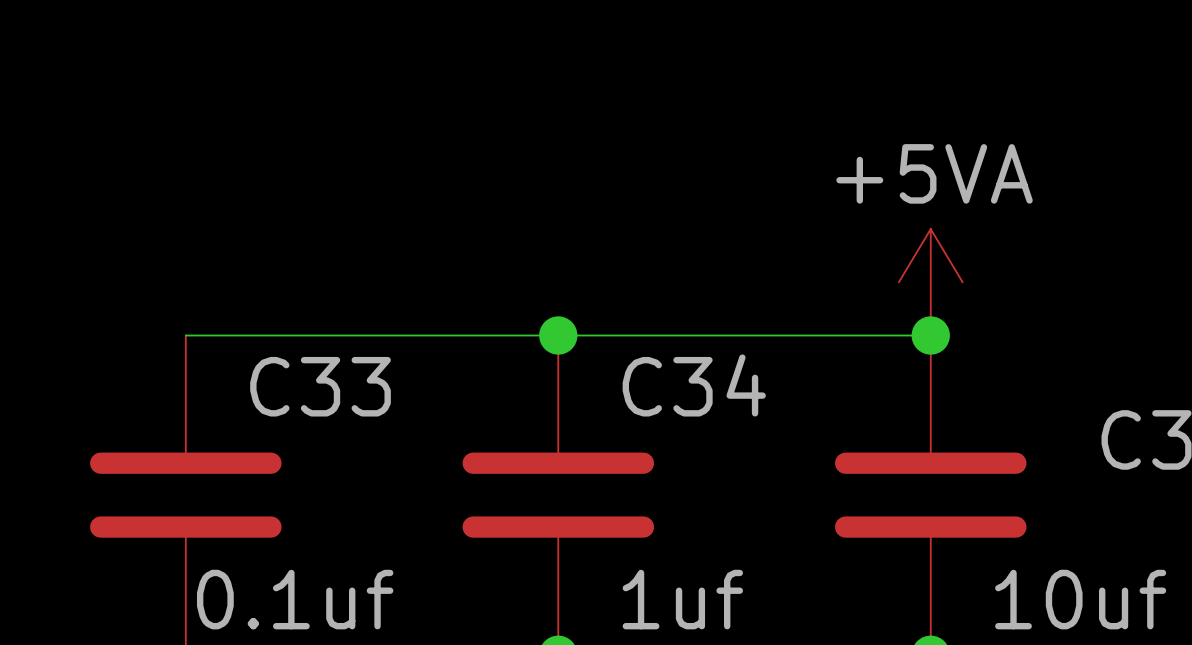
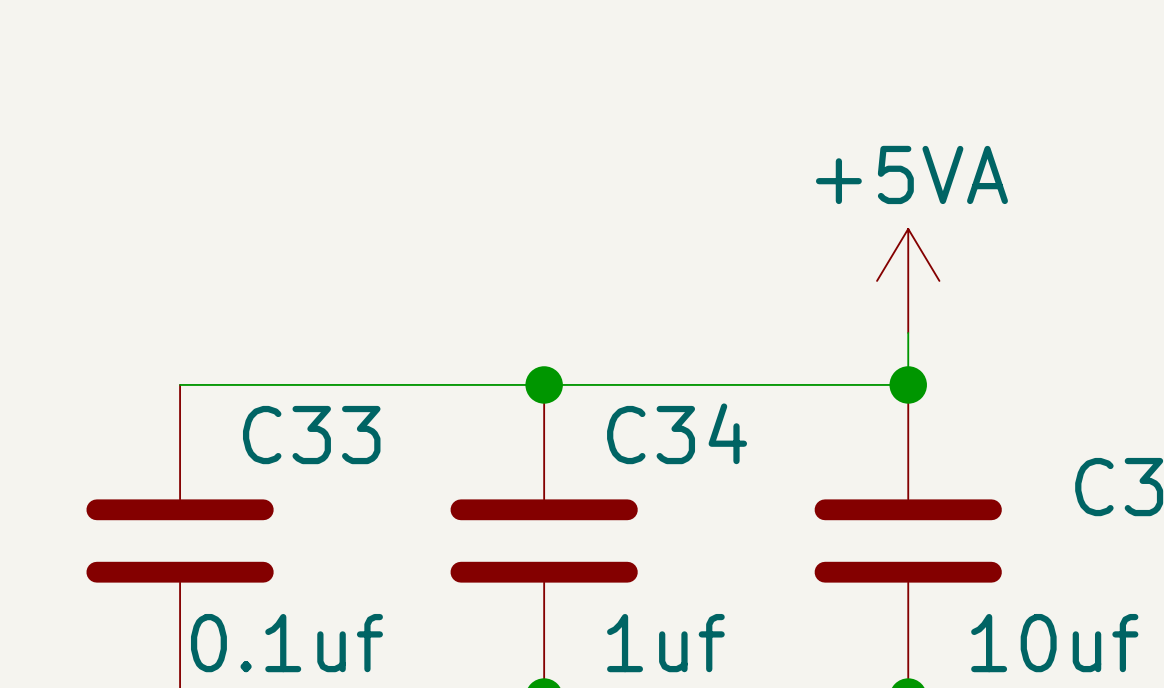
power symbol position: +5VA (930, 282) -> +5VA (908, 280)

